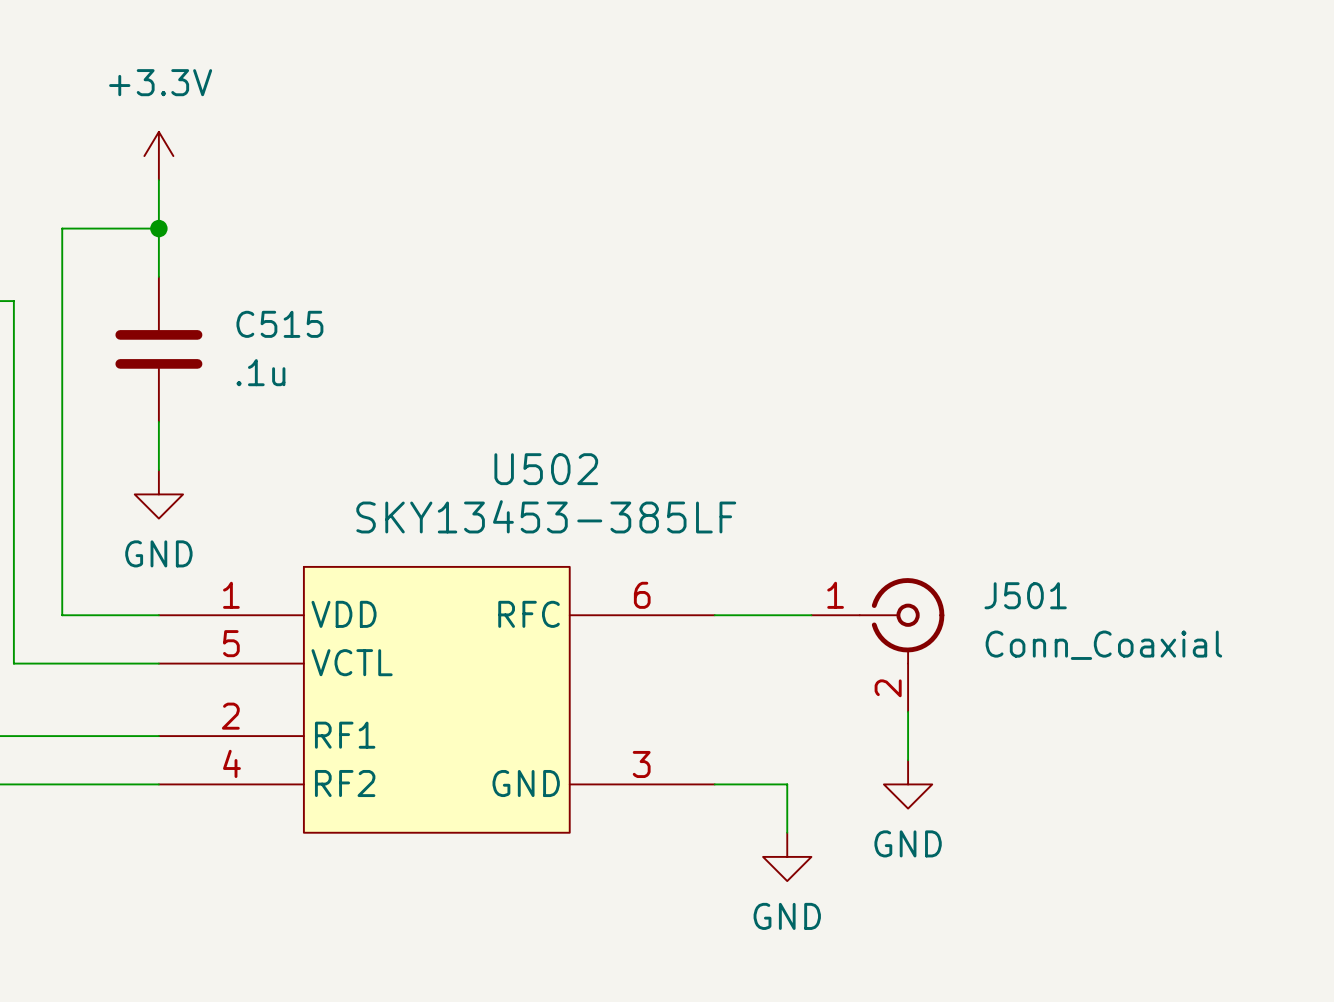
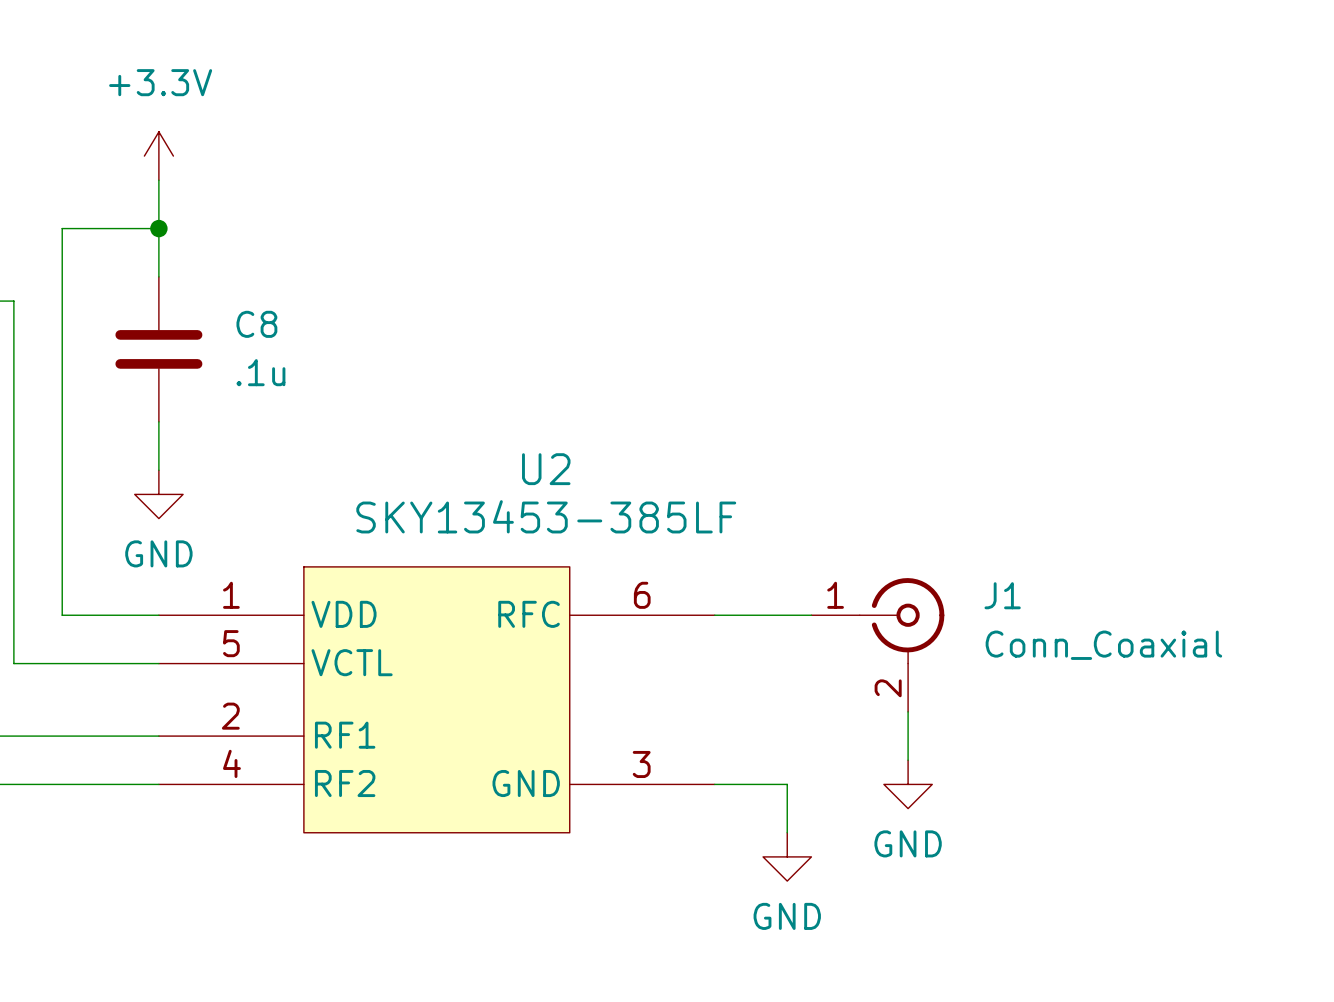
C515 name: C515 (279, 324) -> C8 (256, 324)
U502 name: U502 (546, 469) -> U2 (546, 469)
J501 name: J501 (1025, 595) -> J1 (1002, 595)

